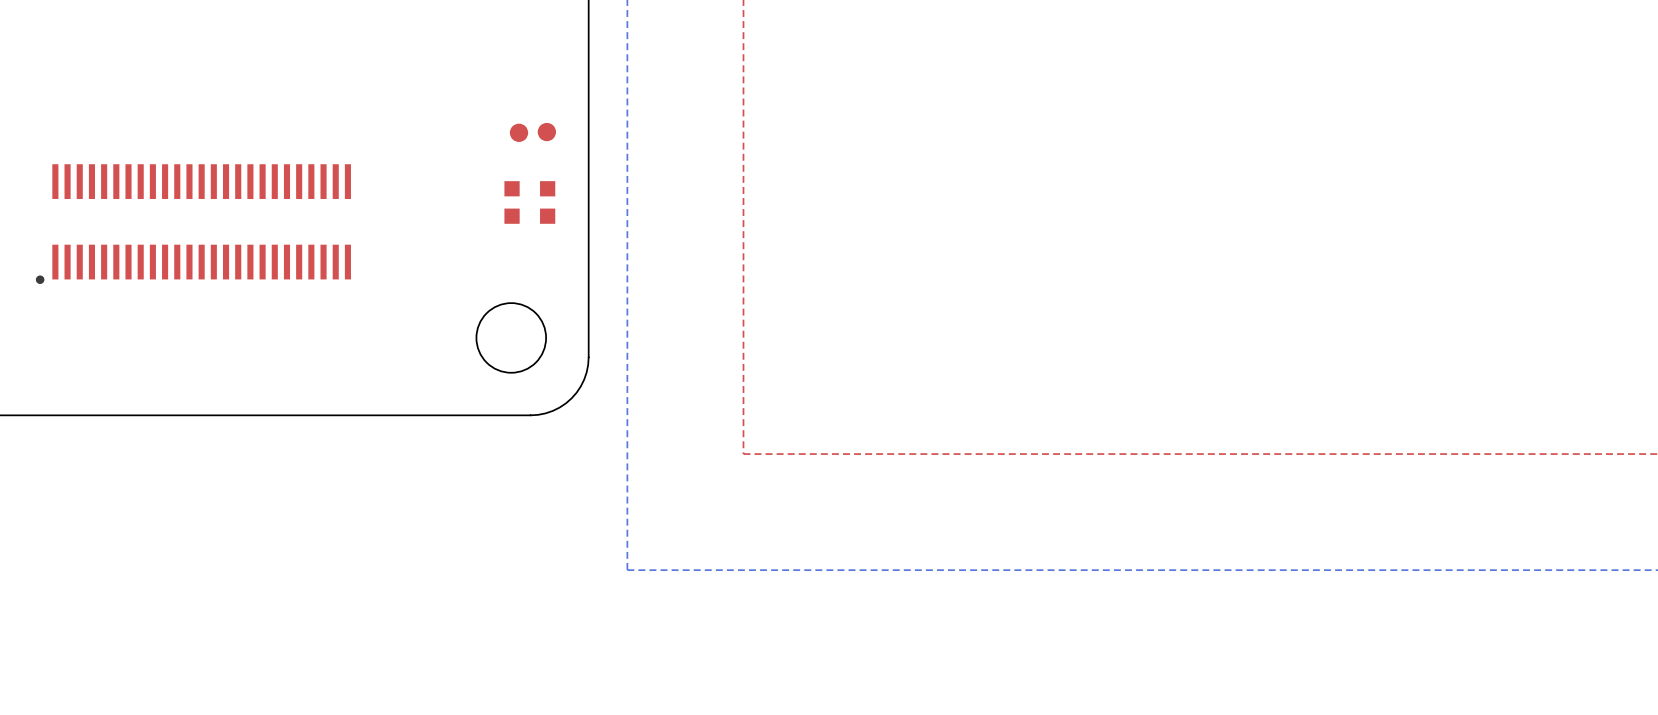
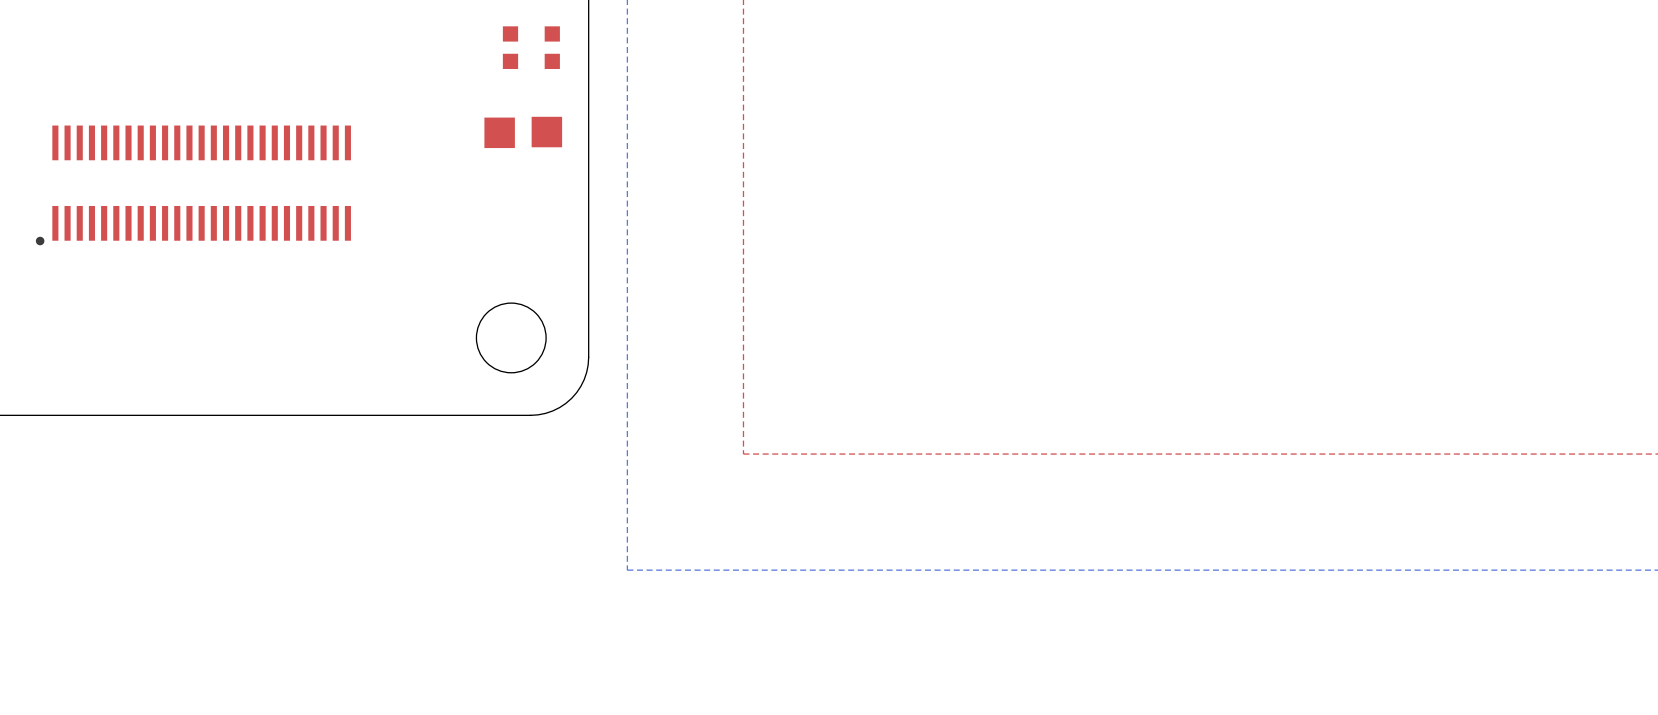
part: none -> (510, 47)
part: none -> (552, 47)
part footprint: [537, 122, 557, 142] -> [531, 116, 563, 148]
part: none -> (499, 132)
part: (519, 132) -> none
part: (512, 202) -> none
part: (547, 202) -> none
part position: (193, 224) -> (193, 185)

